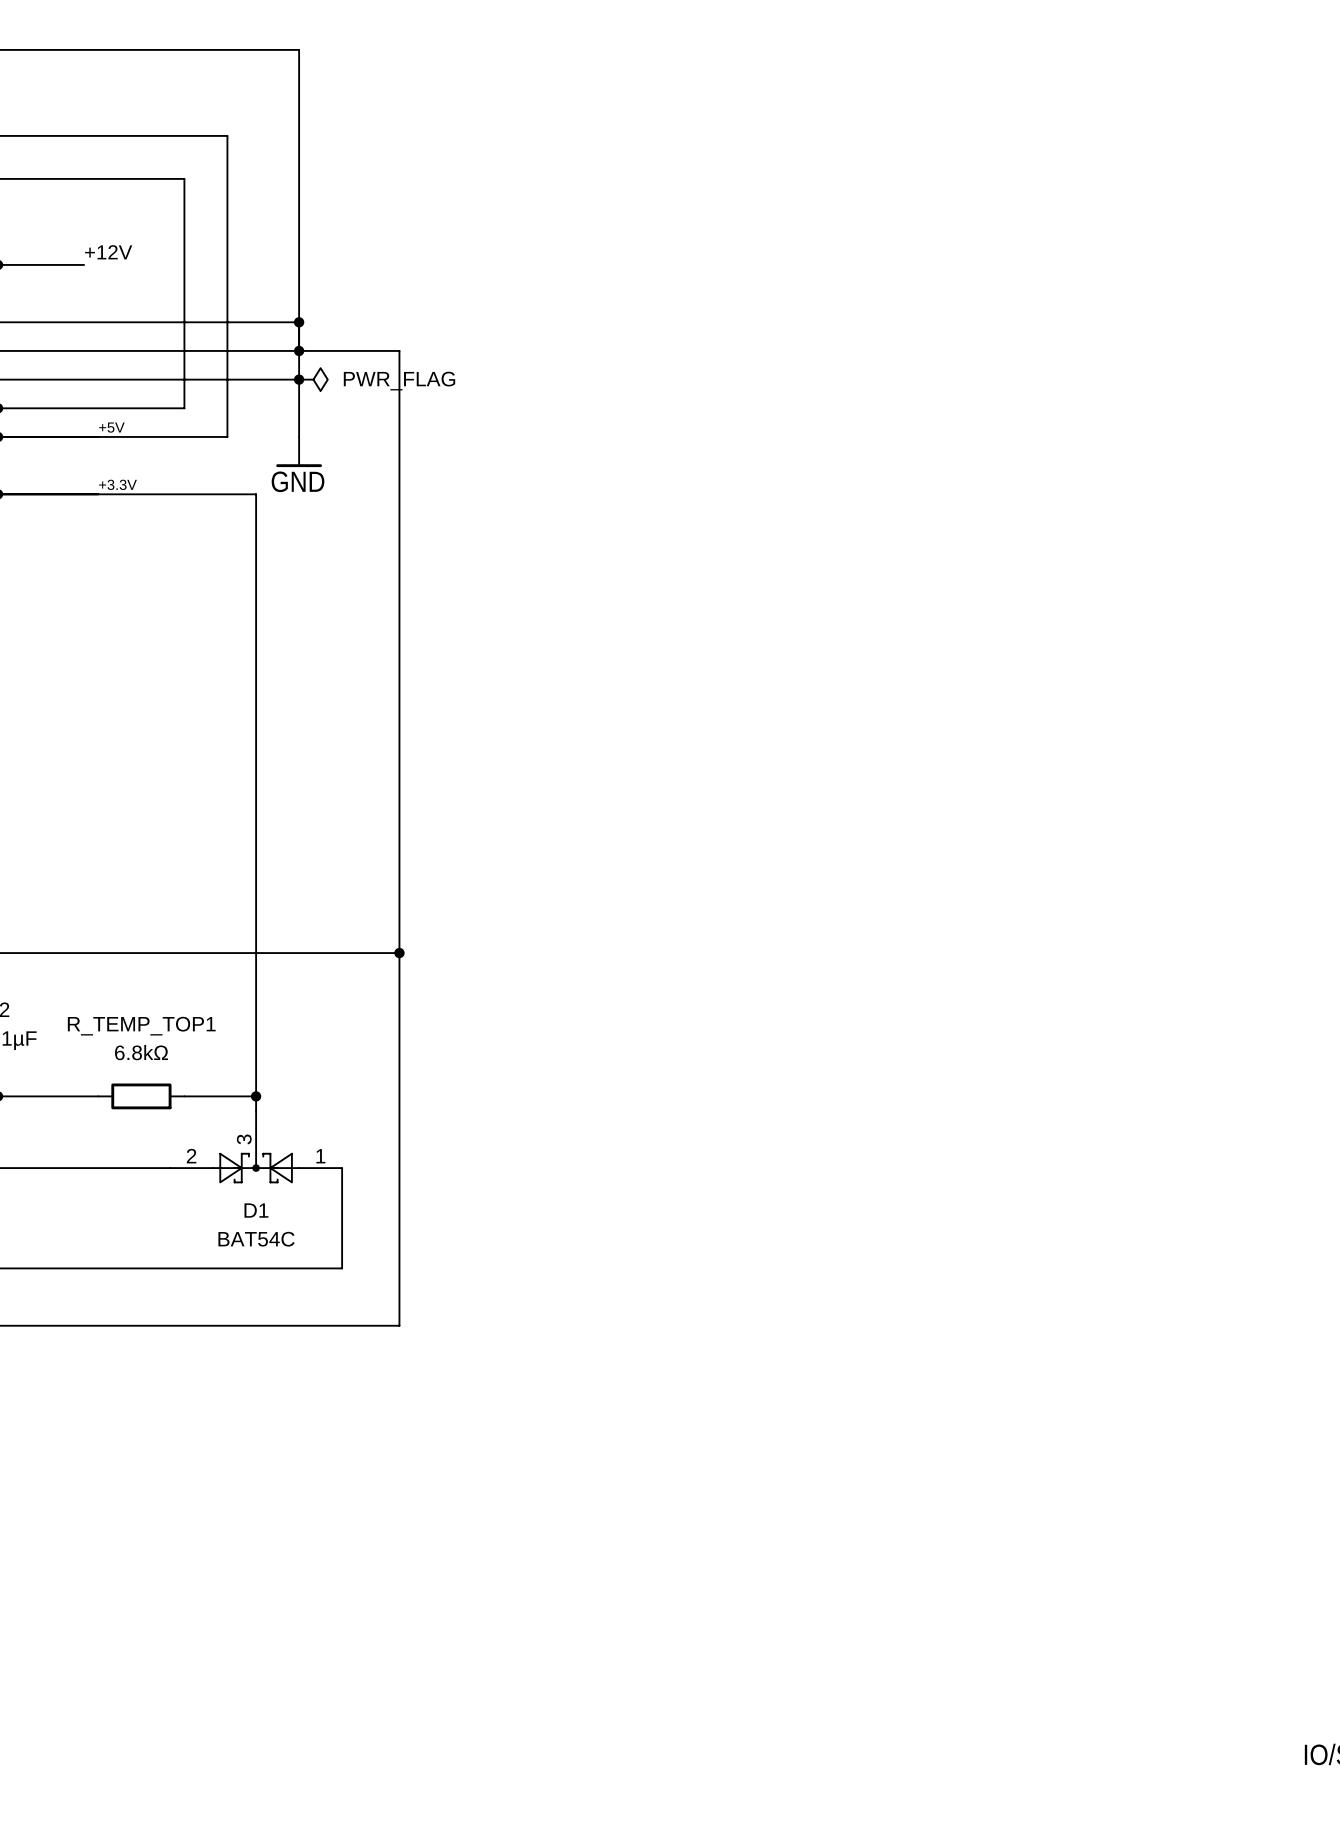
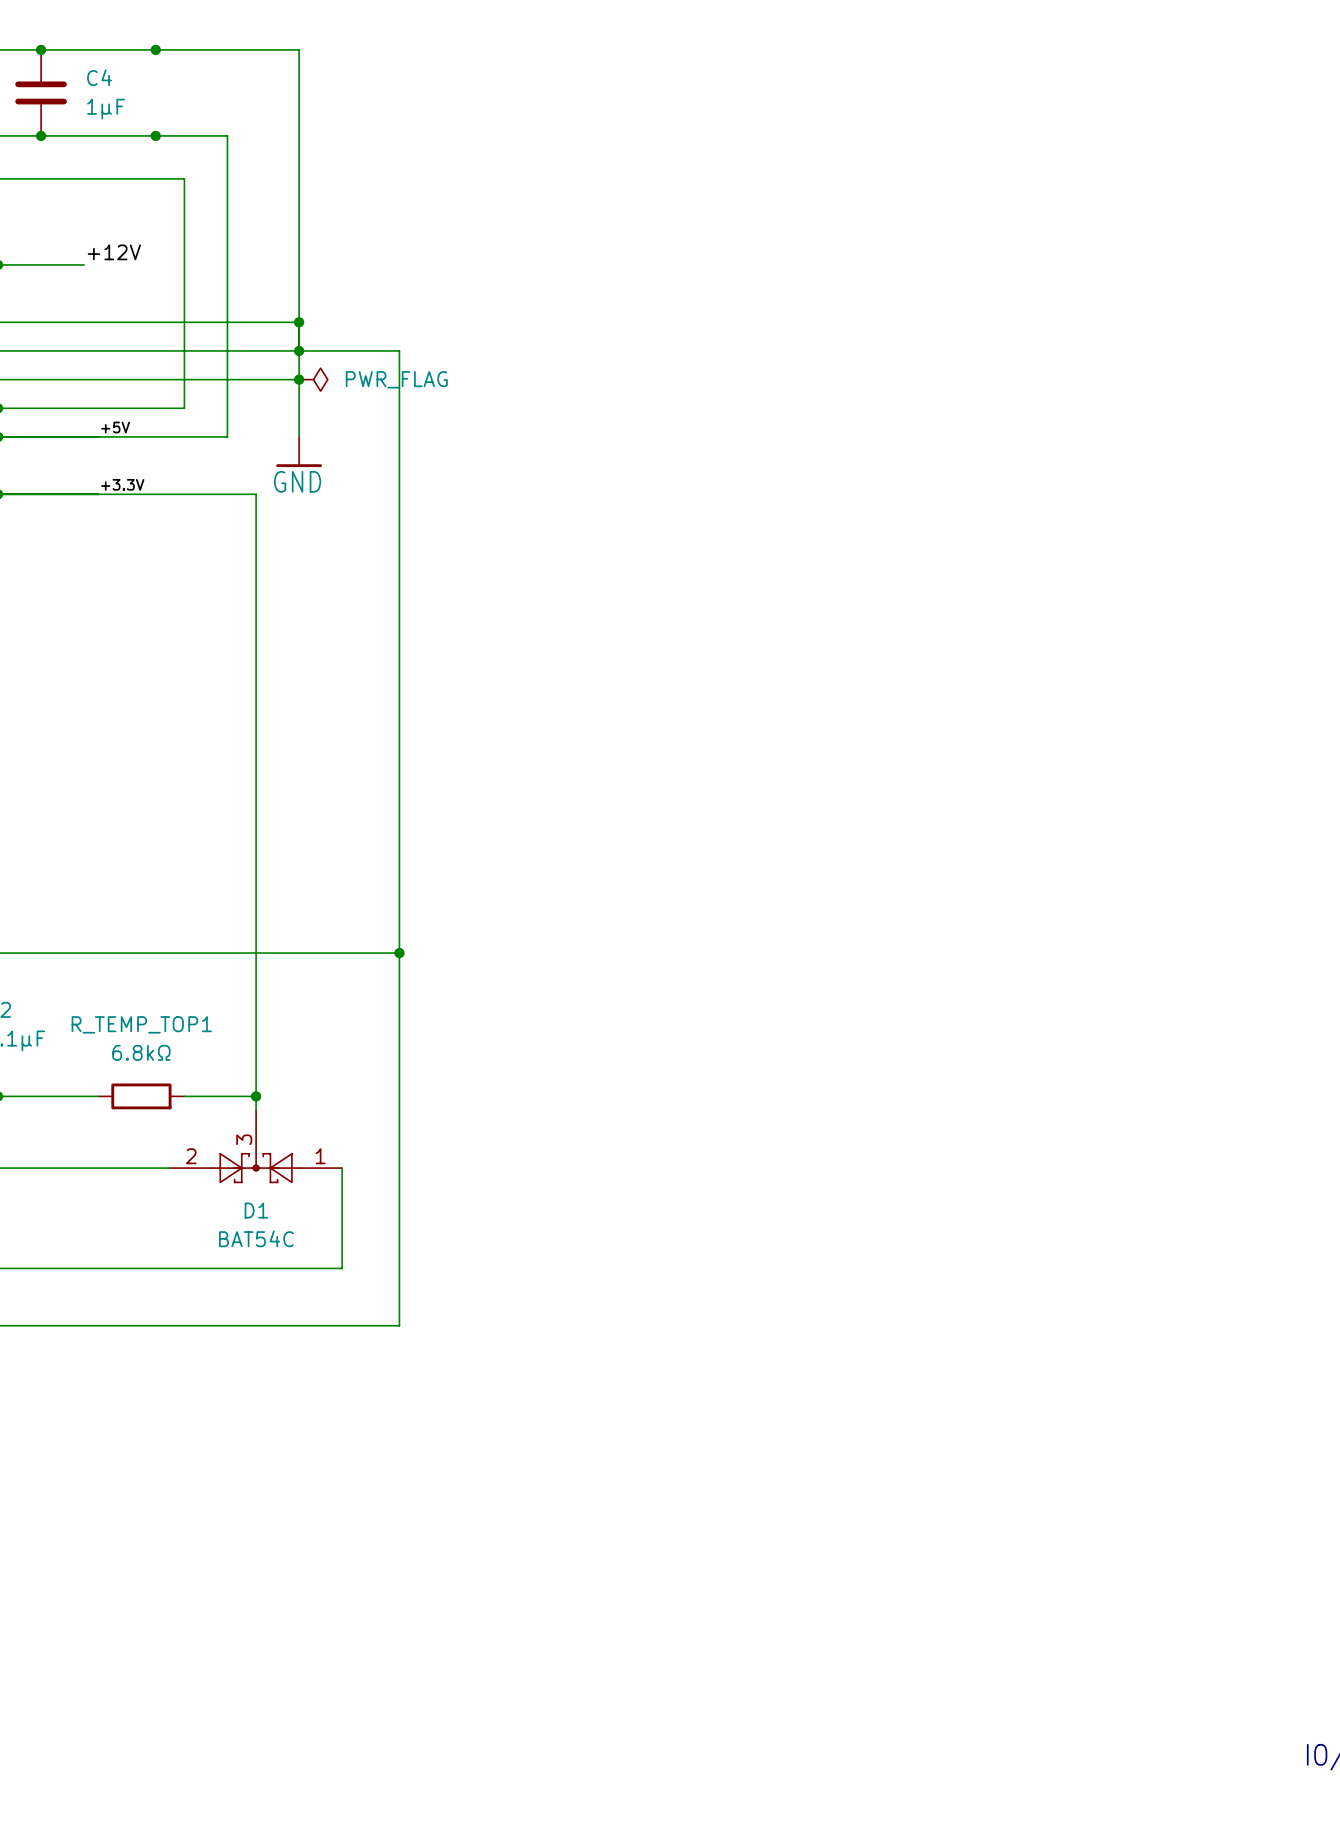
junction: none -> (41, 49)
junction: none -> (155, 49)
C4: none -> 1µF (41, 92)
junction: none -> (41, 135)
junction: none -> (155, 135)

